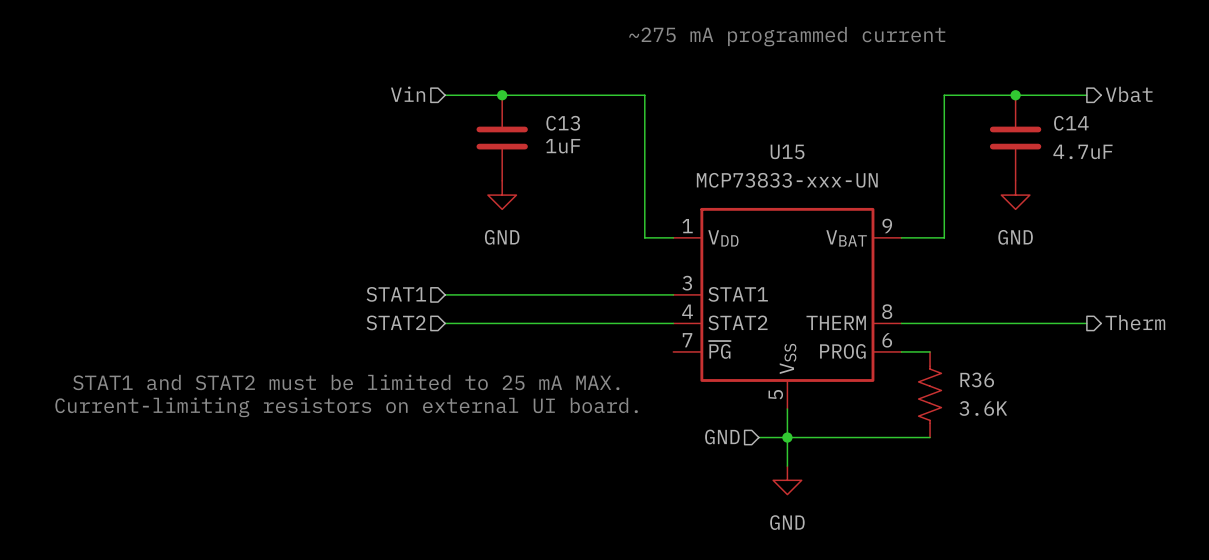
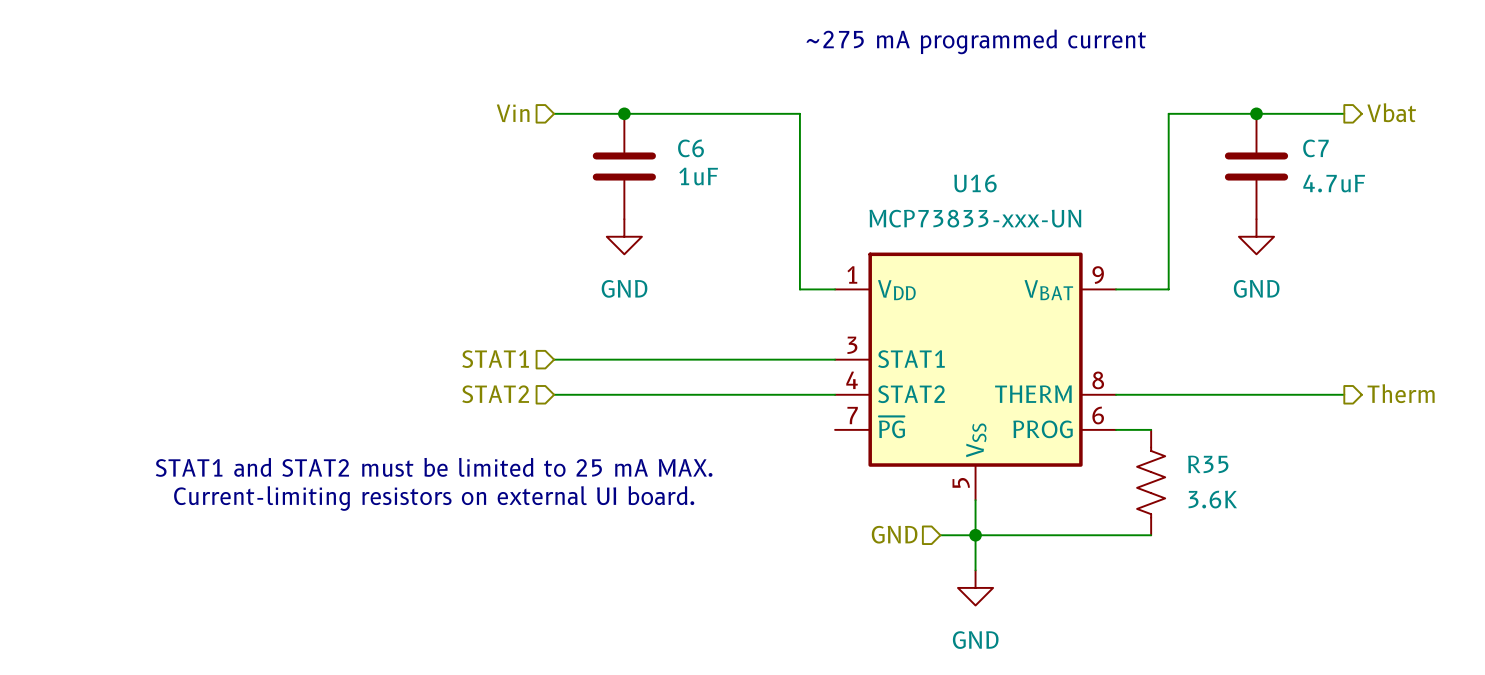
C13 name: C13 (563, 123) -> C6 (690, 148)
C14 name: C14 (1071, 123) -> C7 (1315, 148)
U15 name: U15 (787, 151) -> U16 (975, 183)
R36 name: R36 (977, 379) -> R35 (1208, 464)

